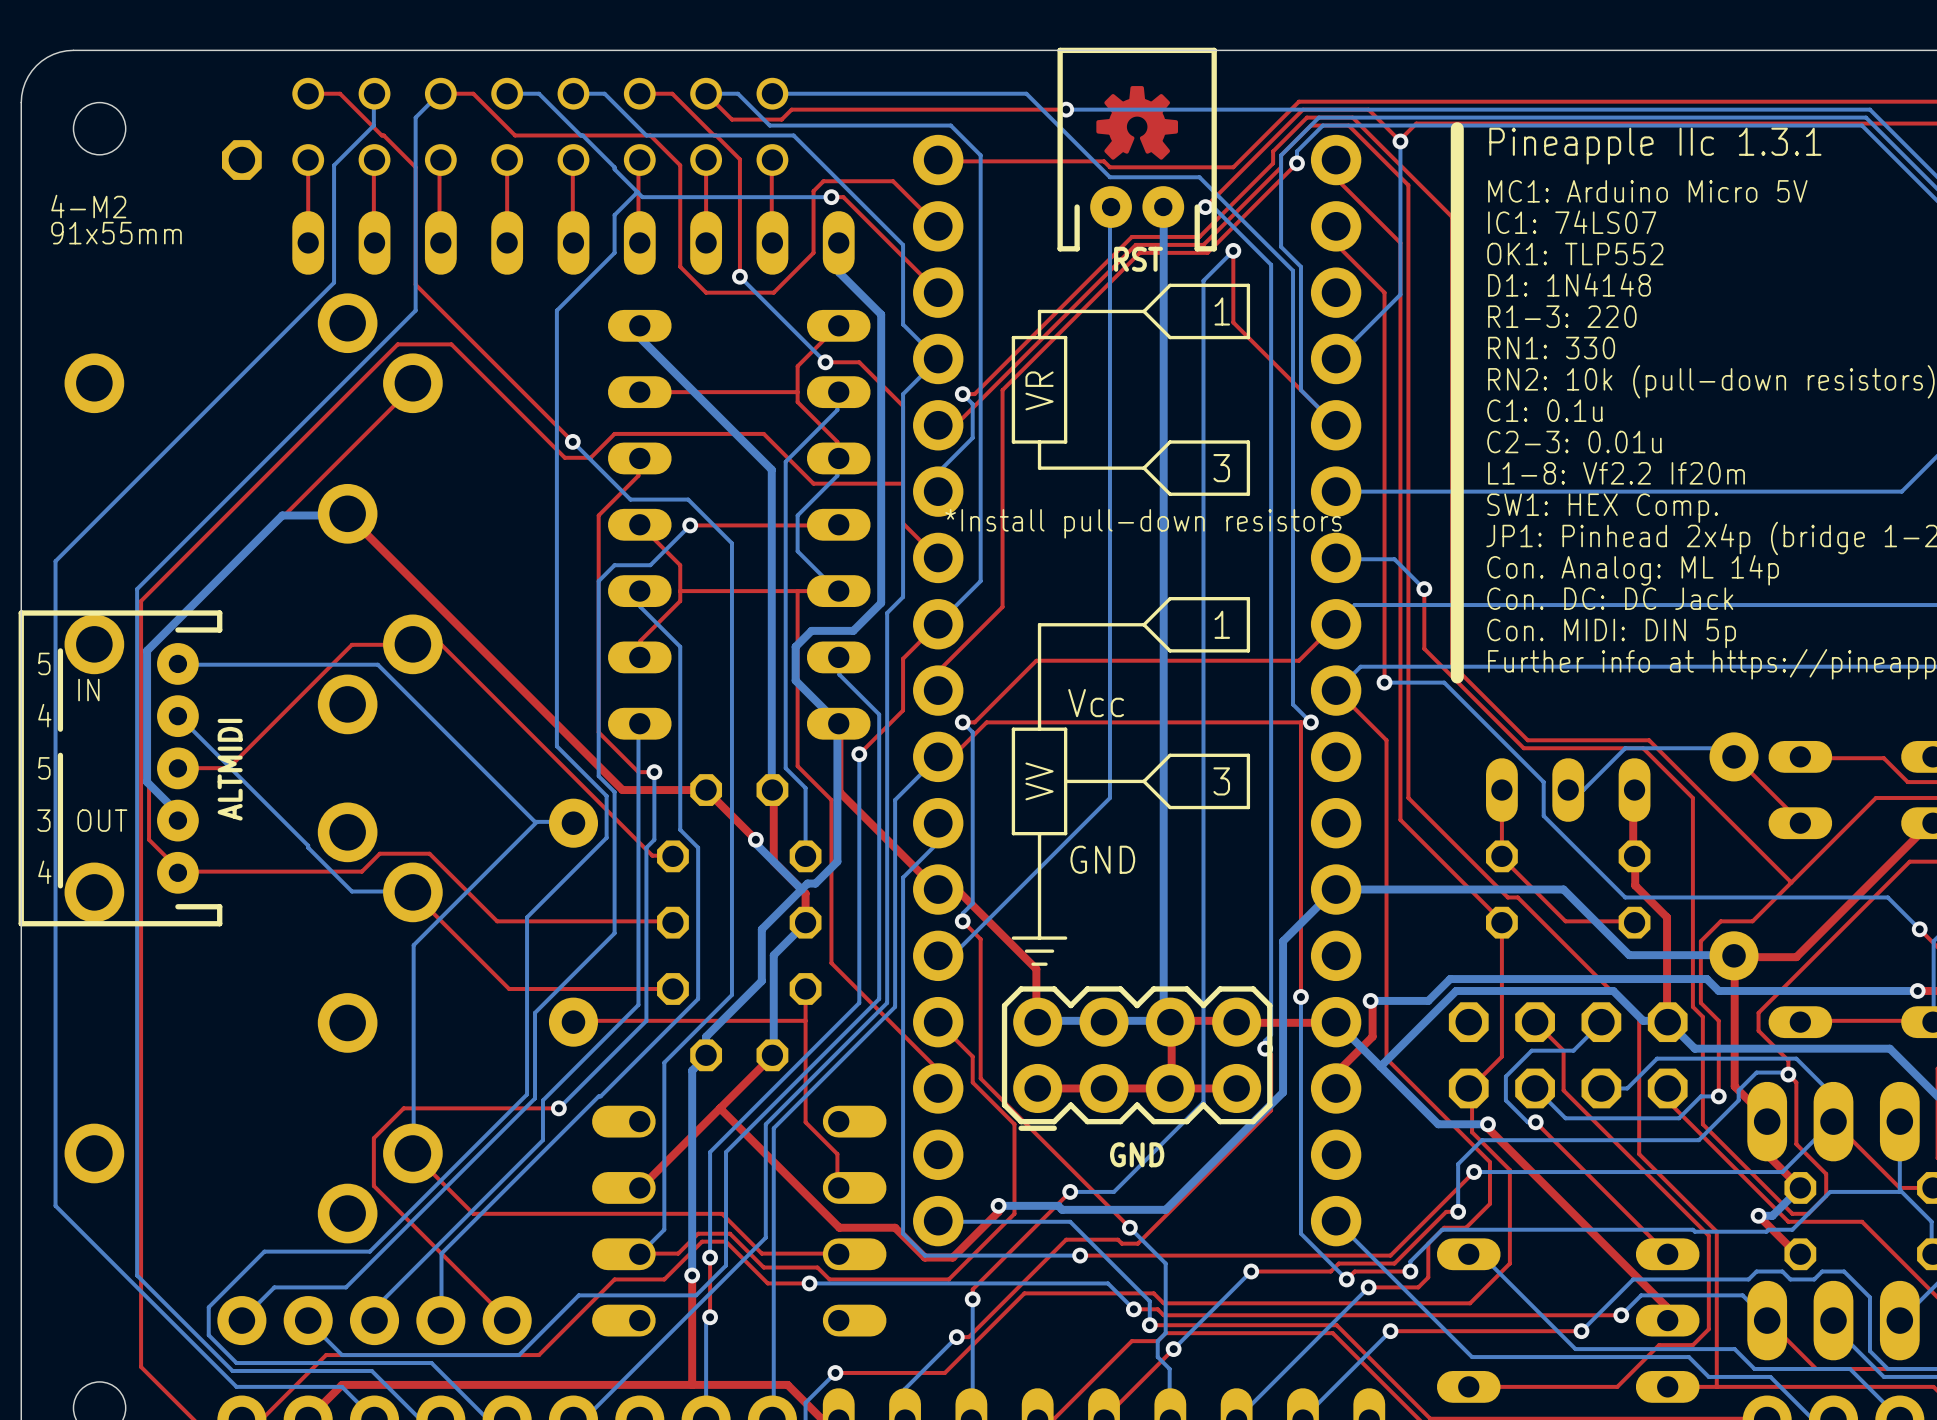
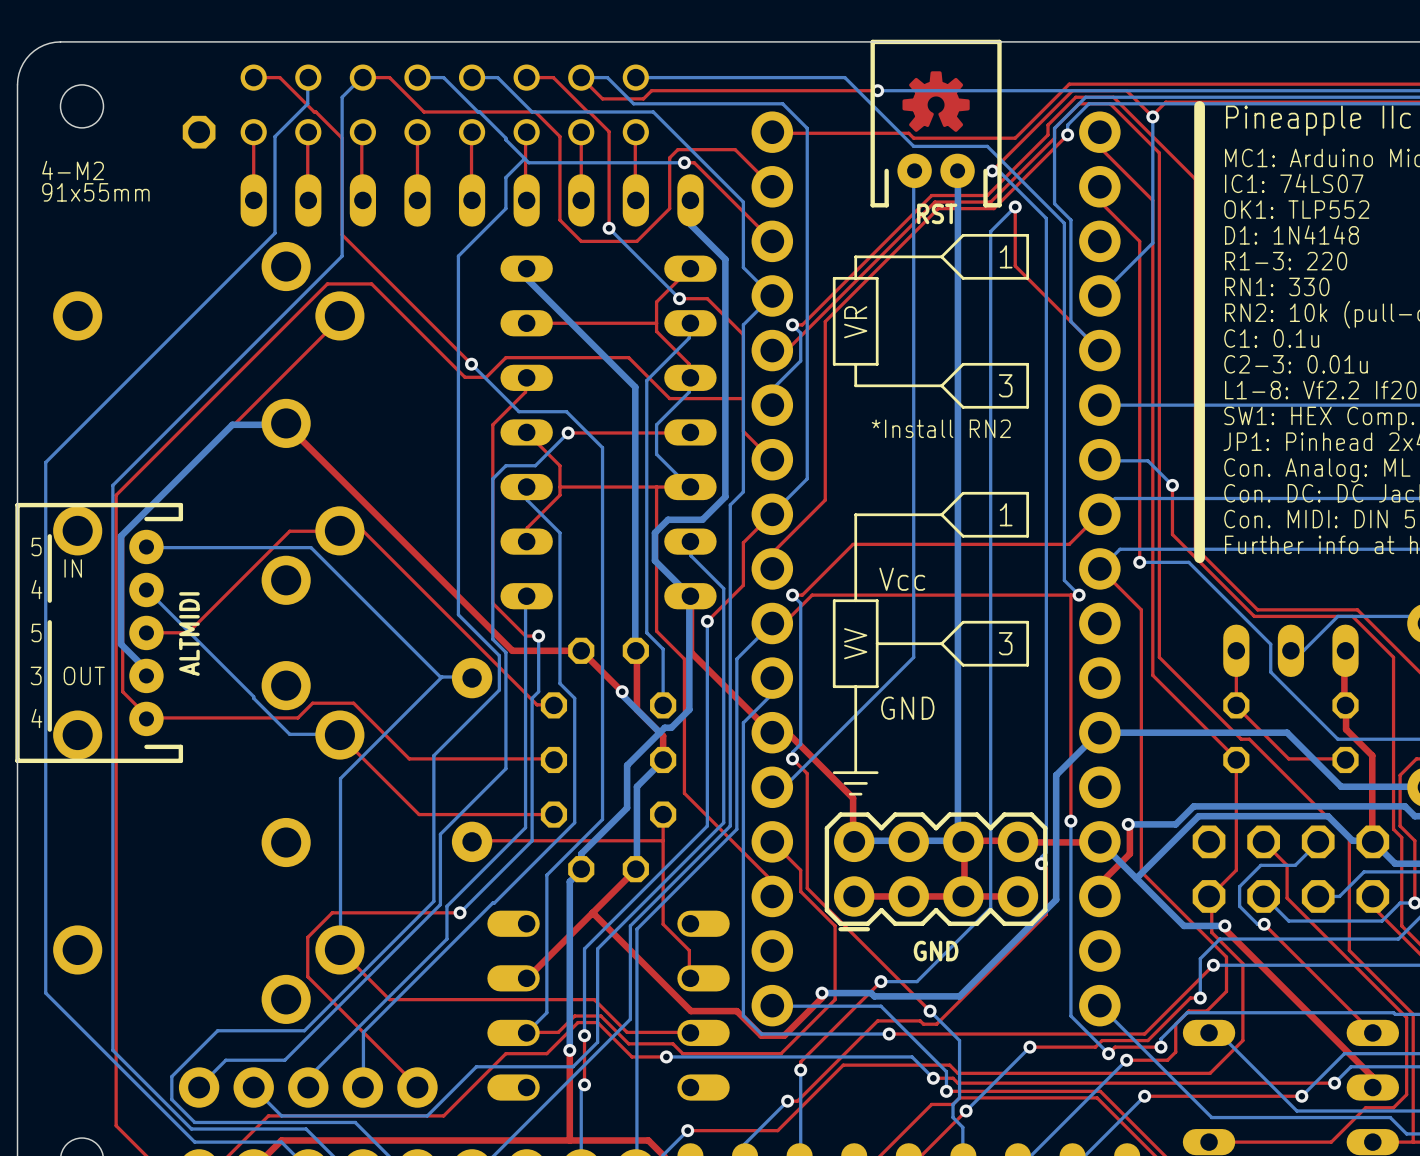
drawing shape: [945, 283, 1342, 966] -> [832, 233, 1030, 796]

